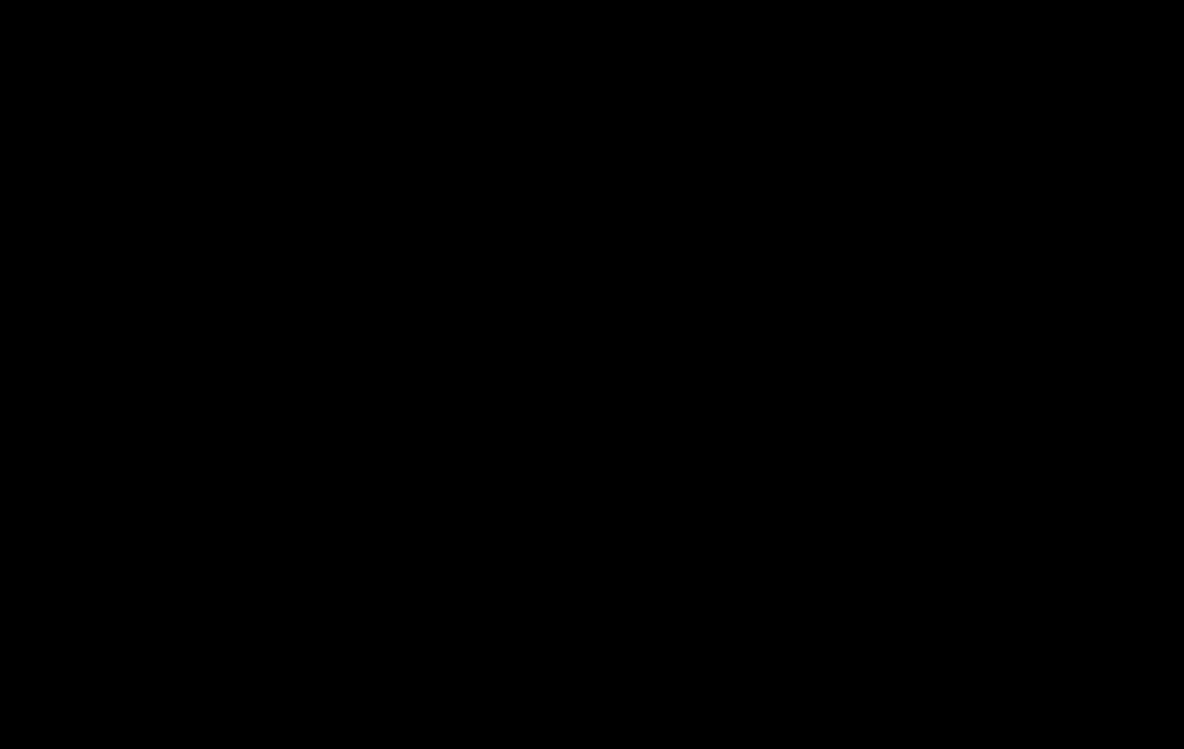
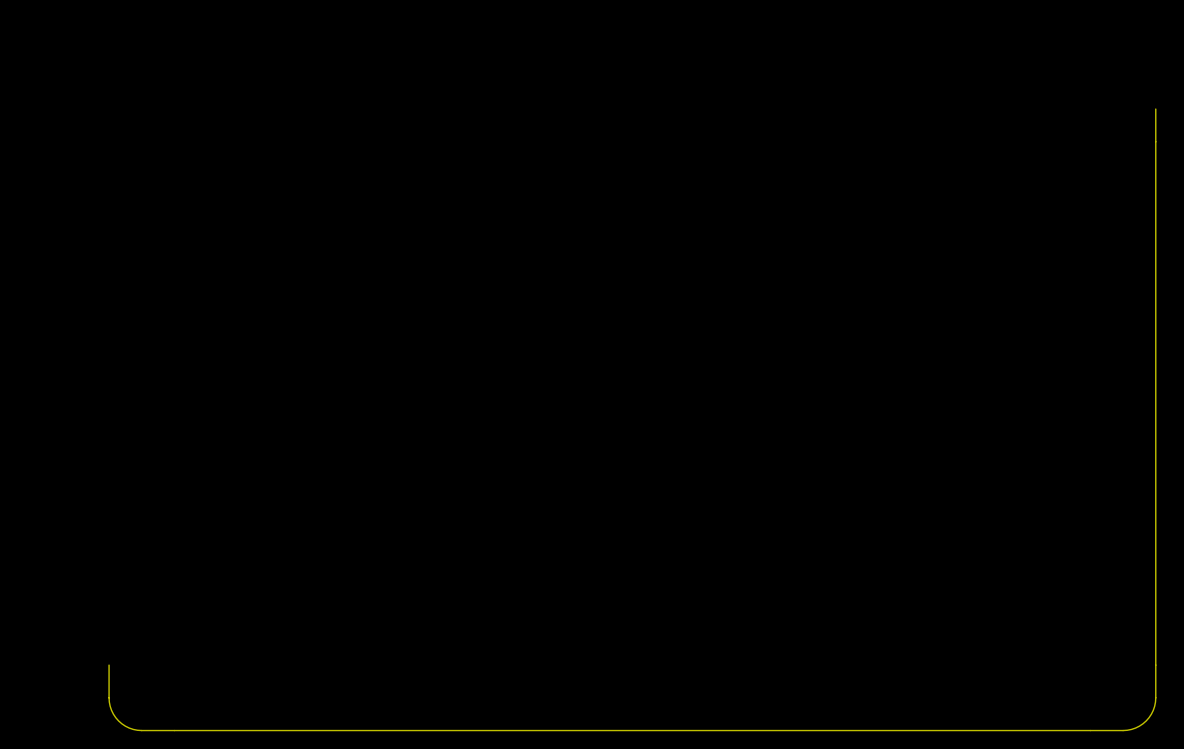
board edge: none -> (1155, 109) (1155, 697) (1151, 714) (1139, 726) (1123, 730) (141, 730) (125, 726) (113, 714) (109, 702) (109, 665)

